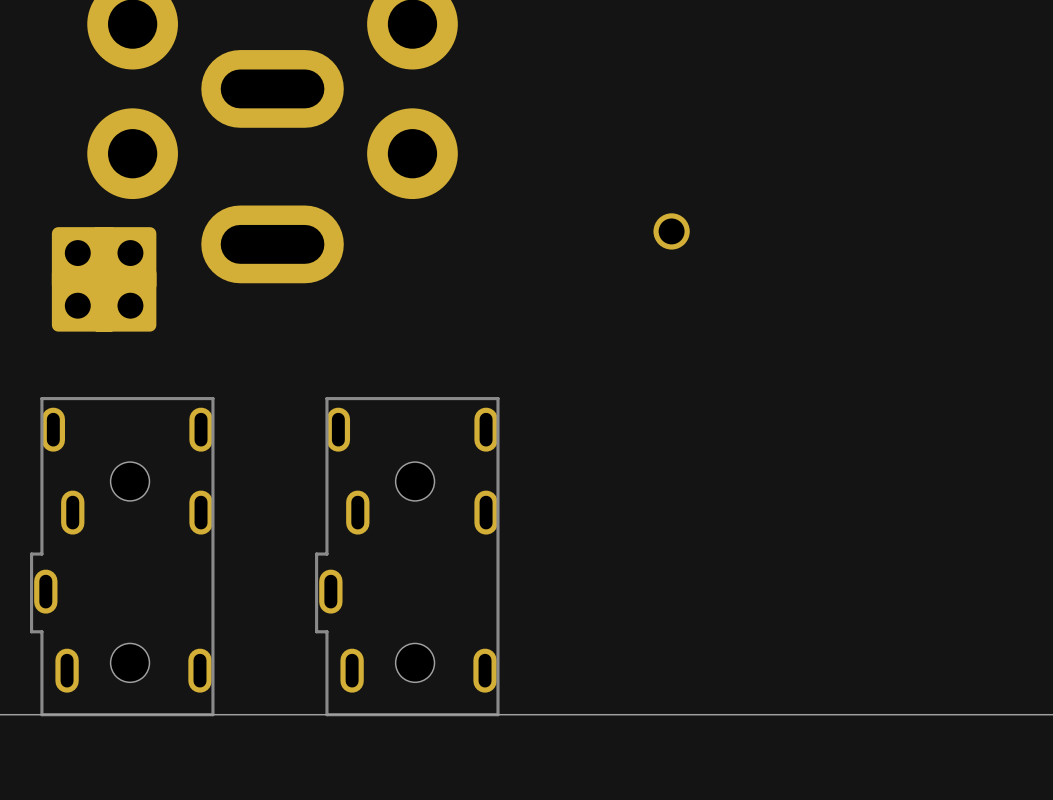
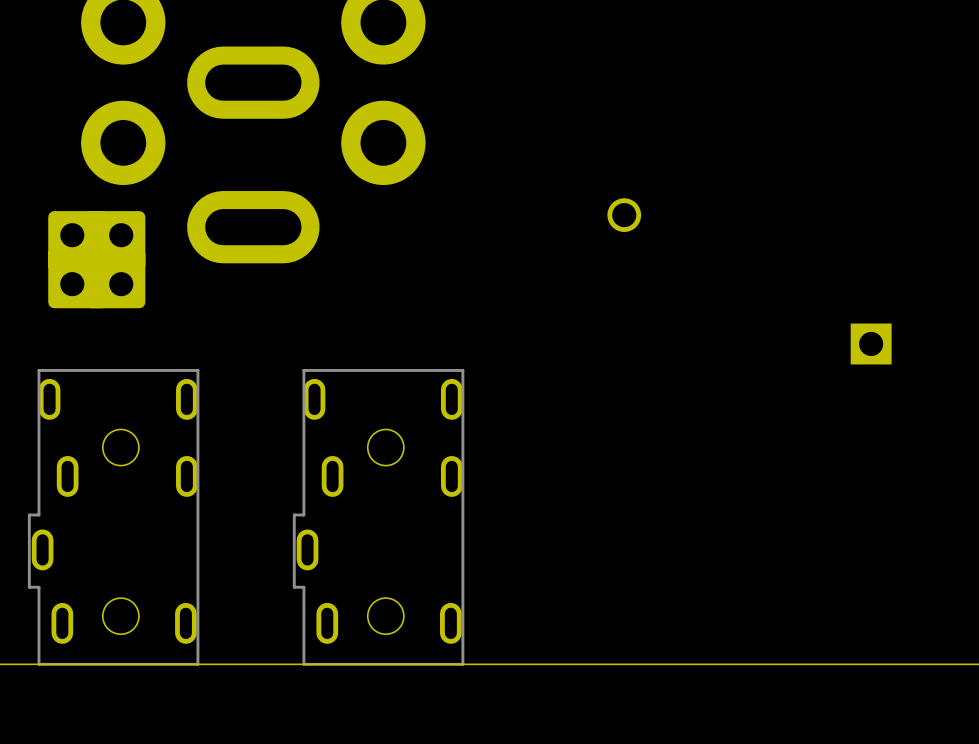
part: none -> (871, 343)

